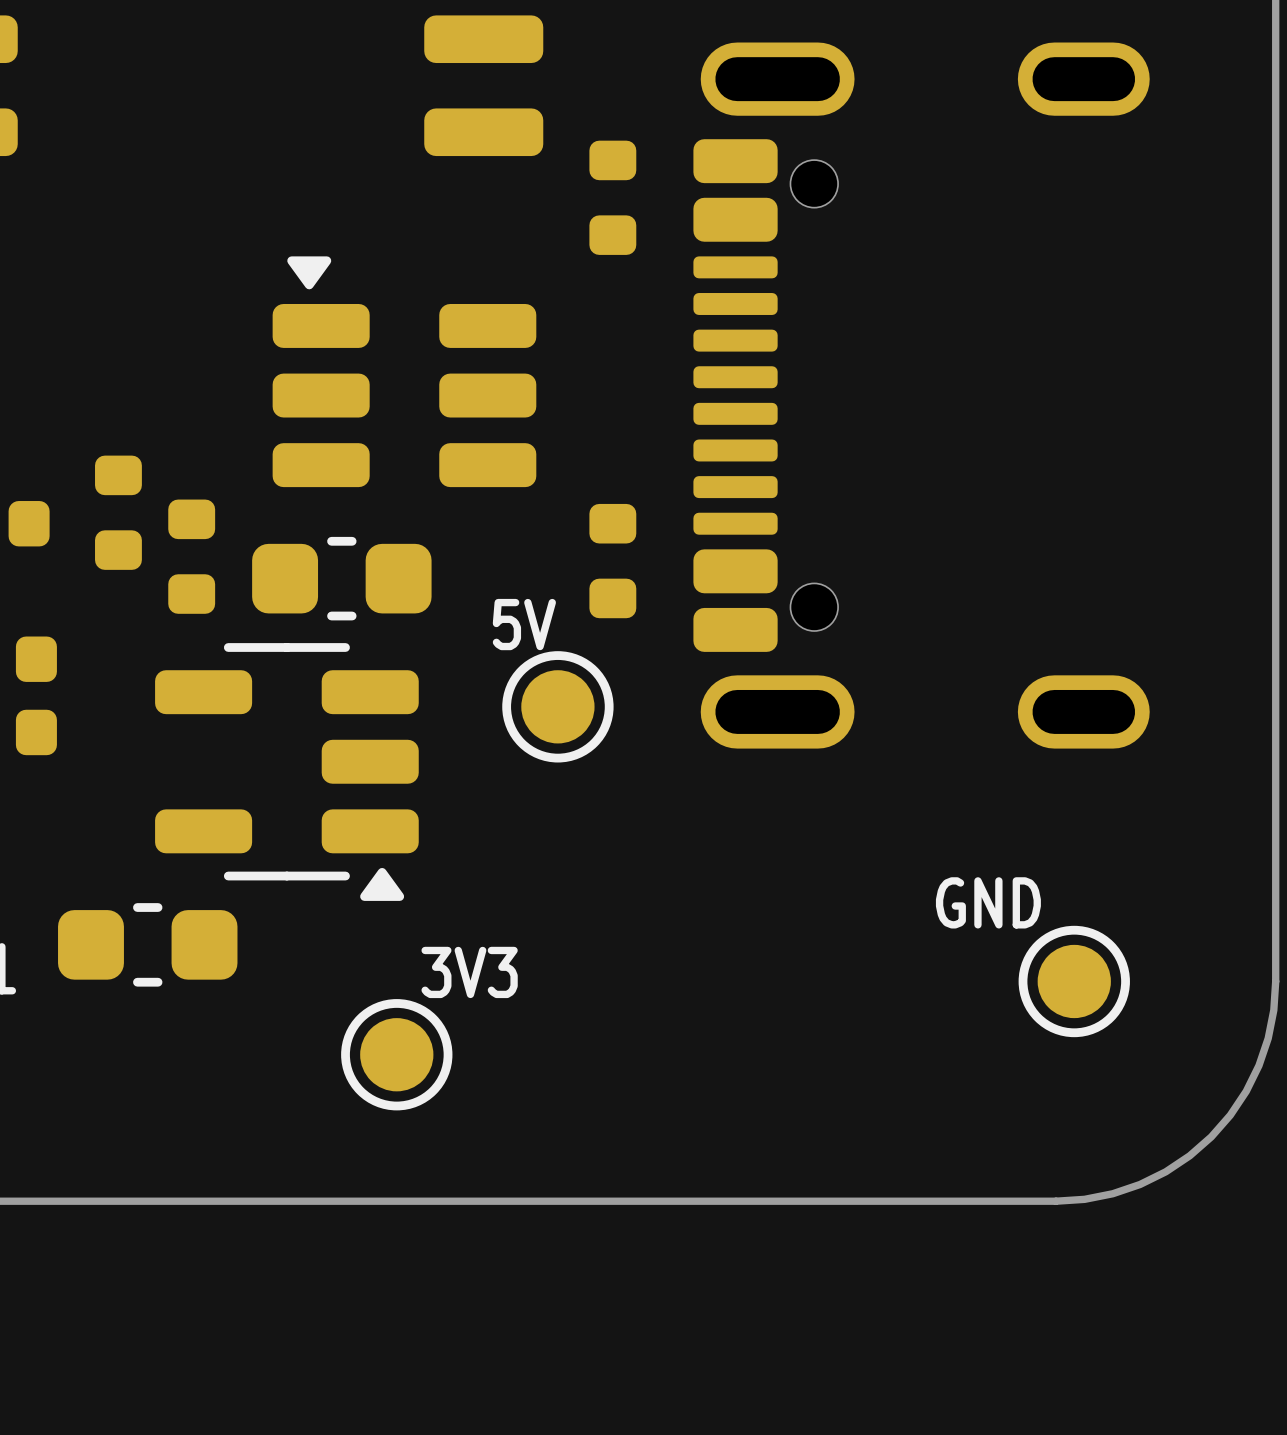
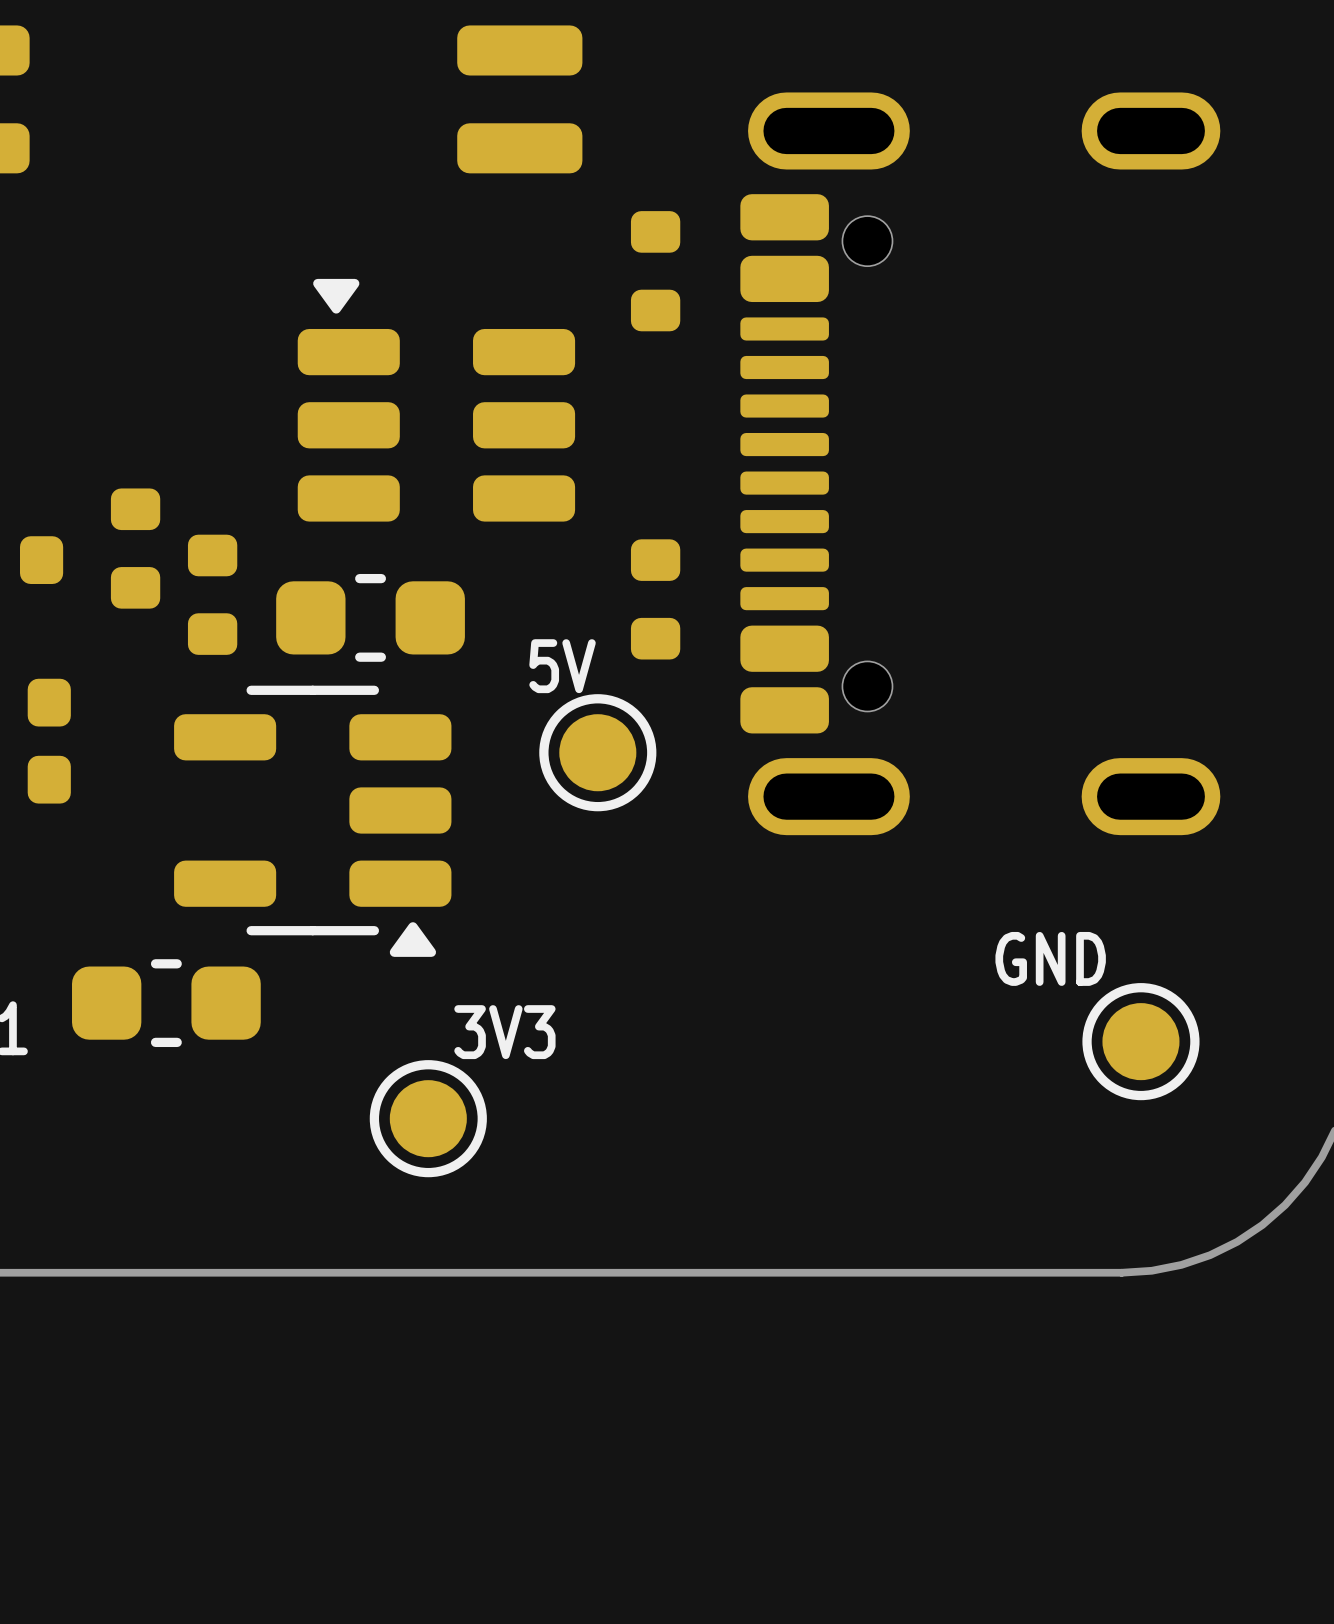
part position: (612, 197) -> (655, 271)
part position: (921, 395) -> (980, 463)

